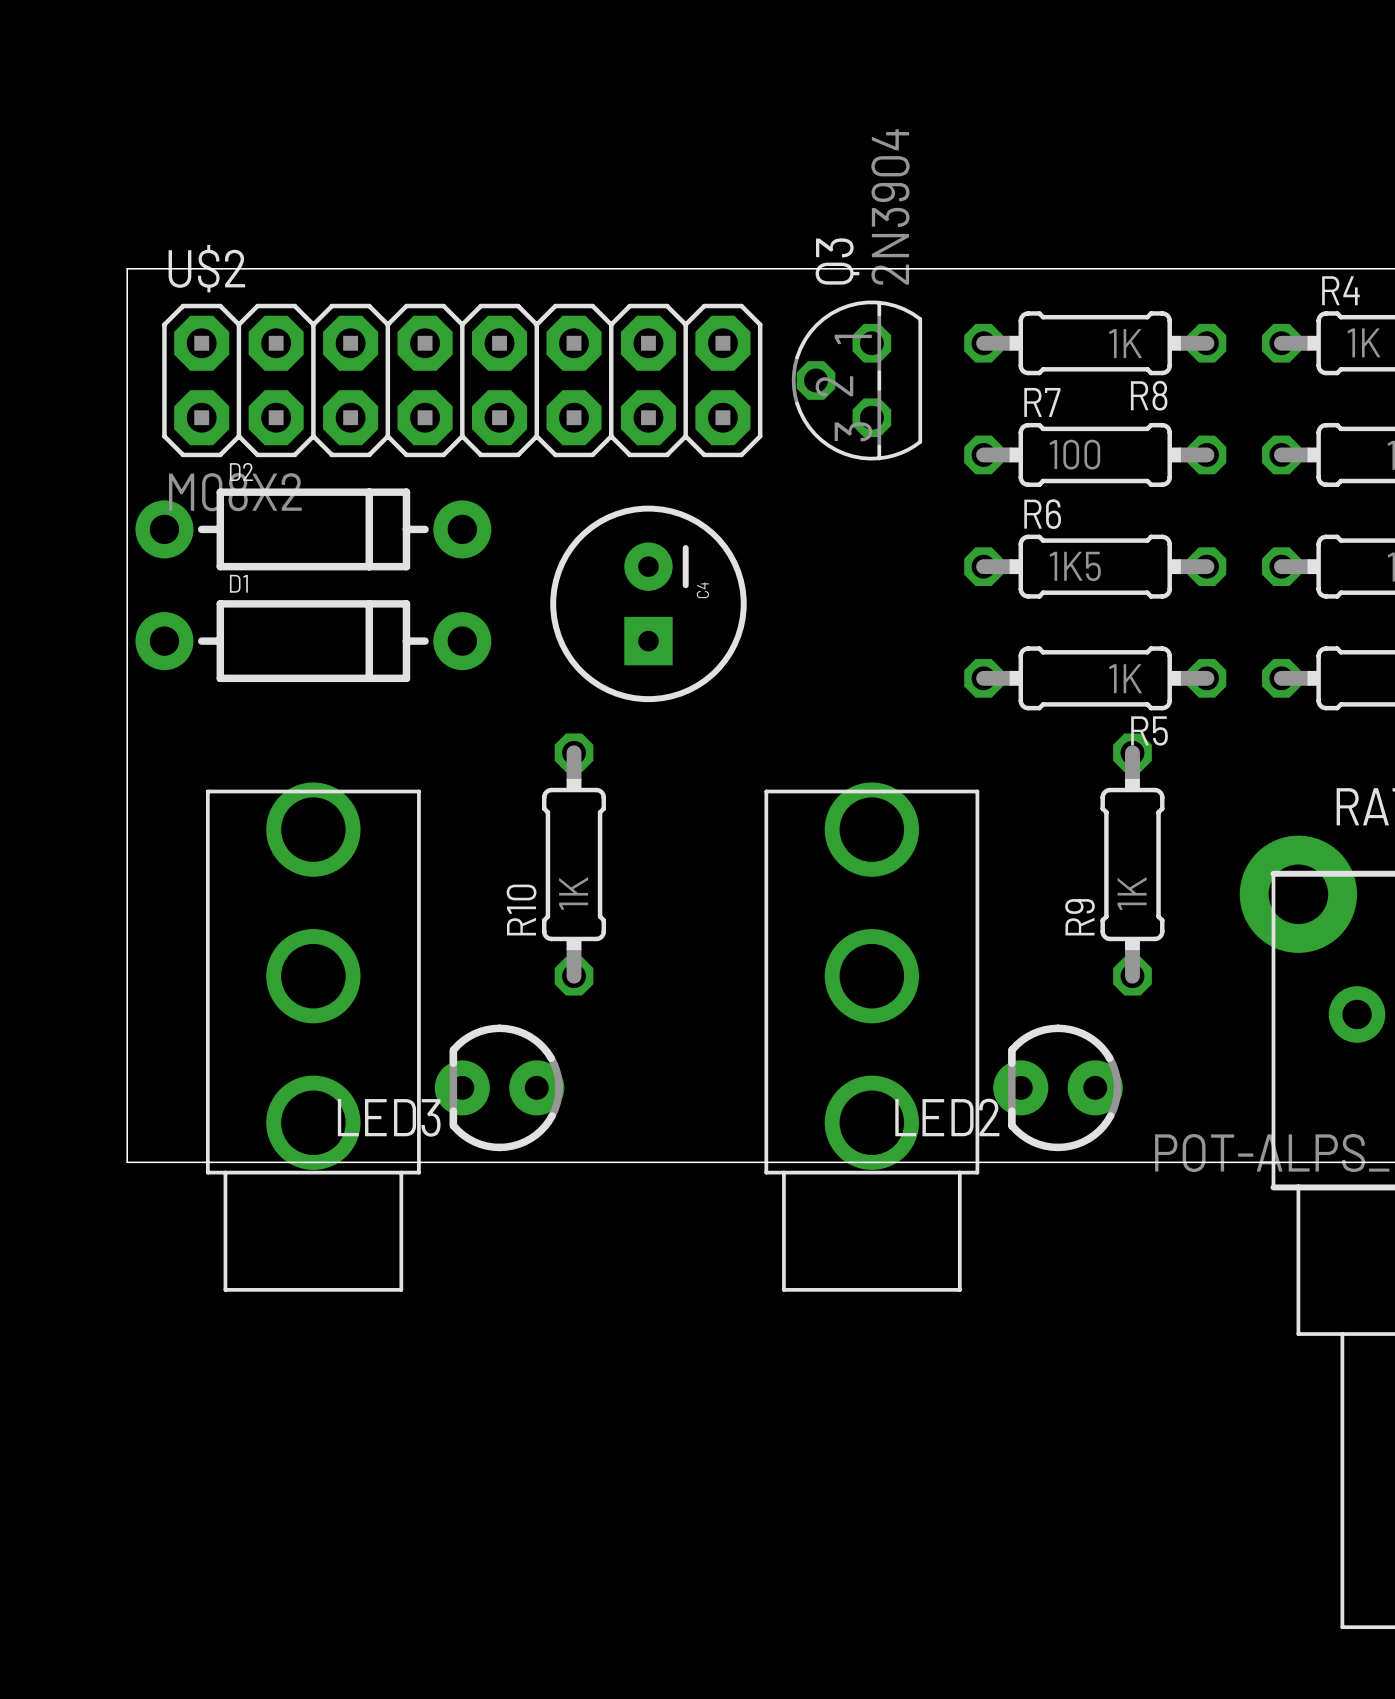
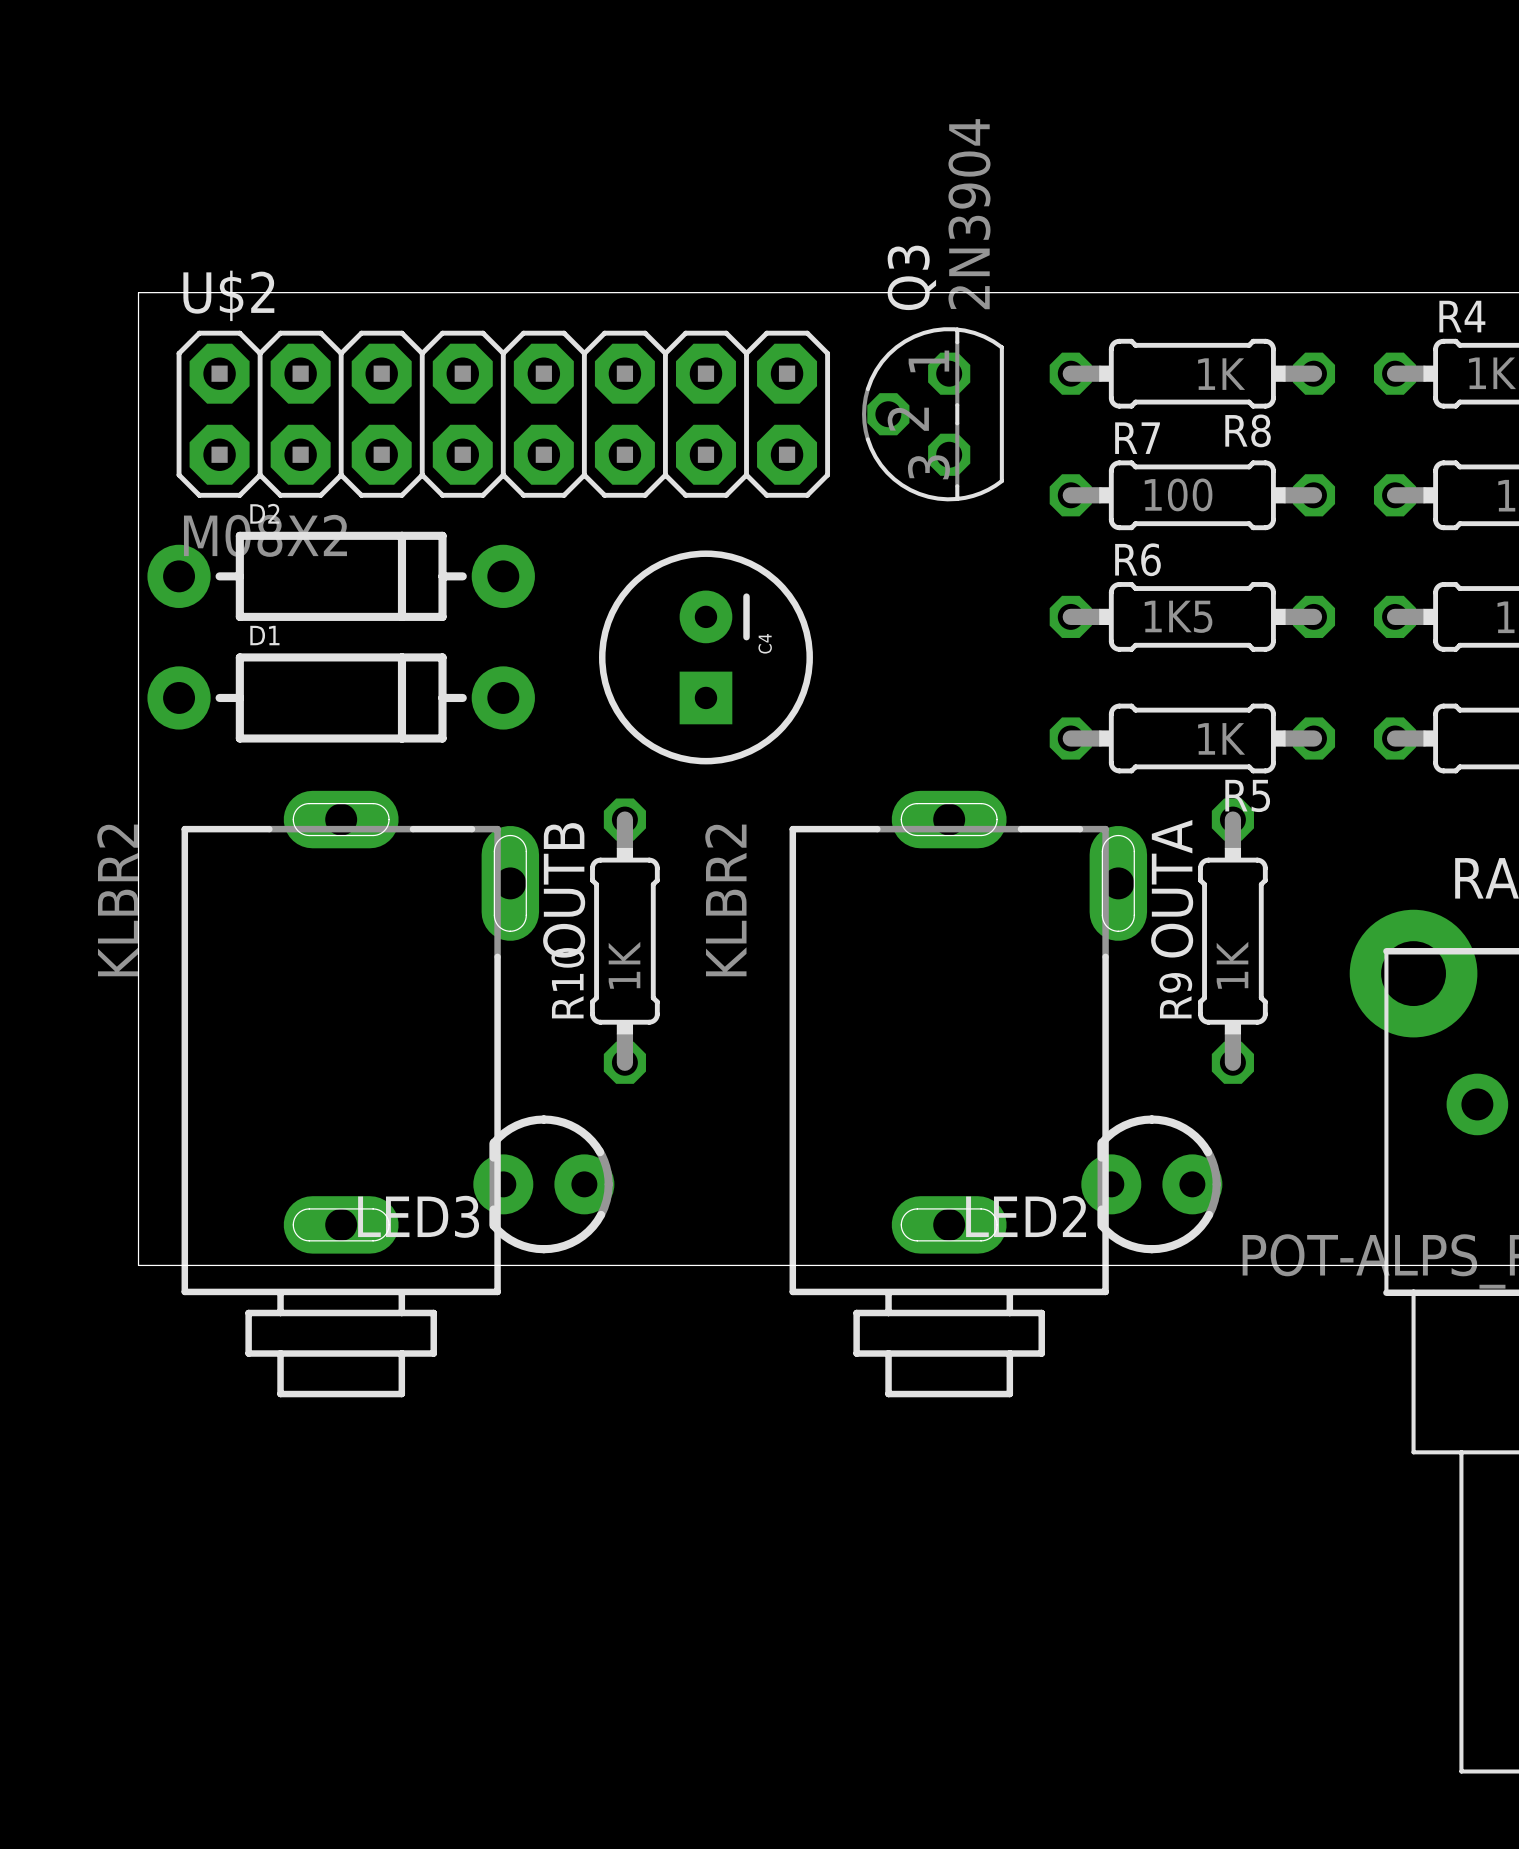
OUTB: none -> KLBR2 (360, 1094)
OUTA: none -> KLBR2 (968, 1094)
part: (313, 1037) -> none
part: (871, 1037) -> none

